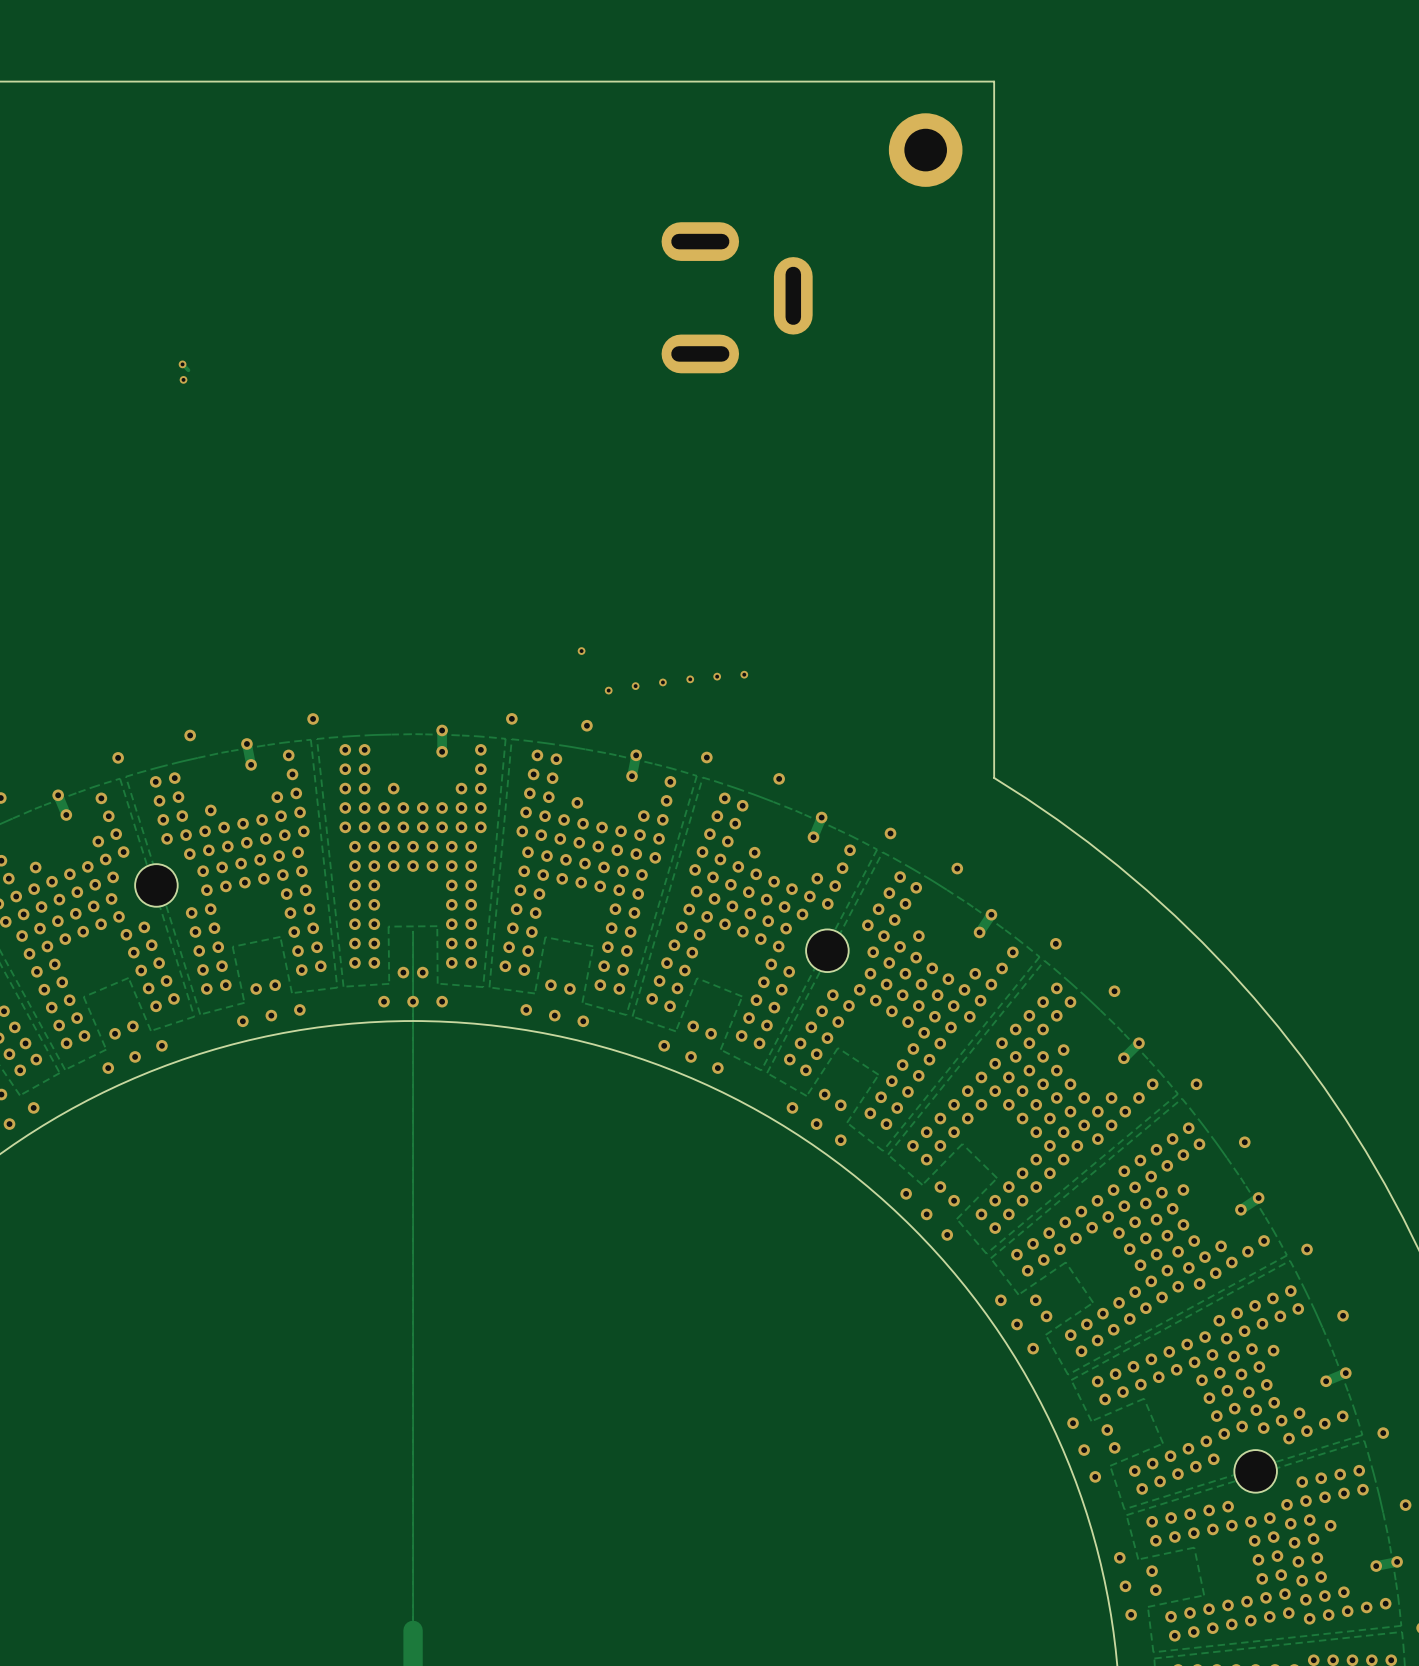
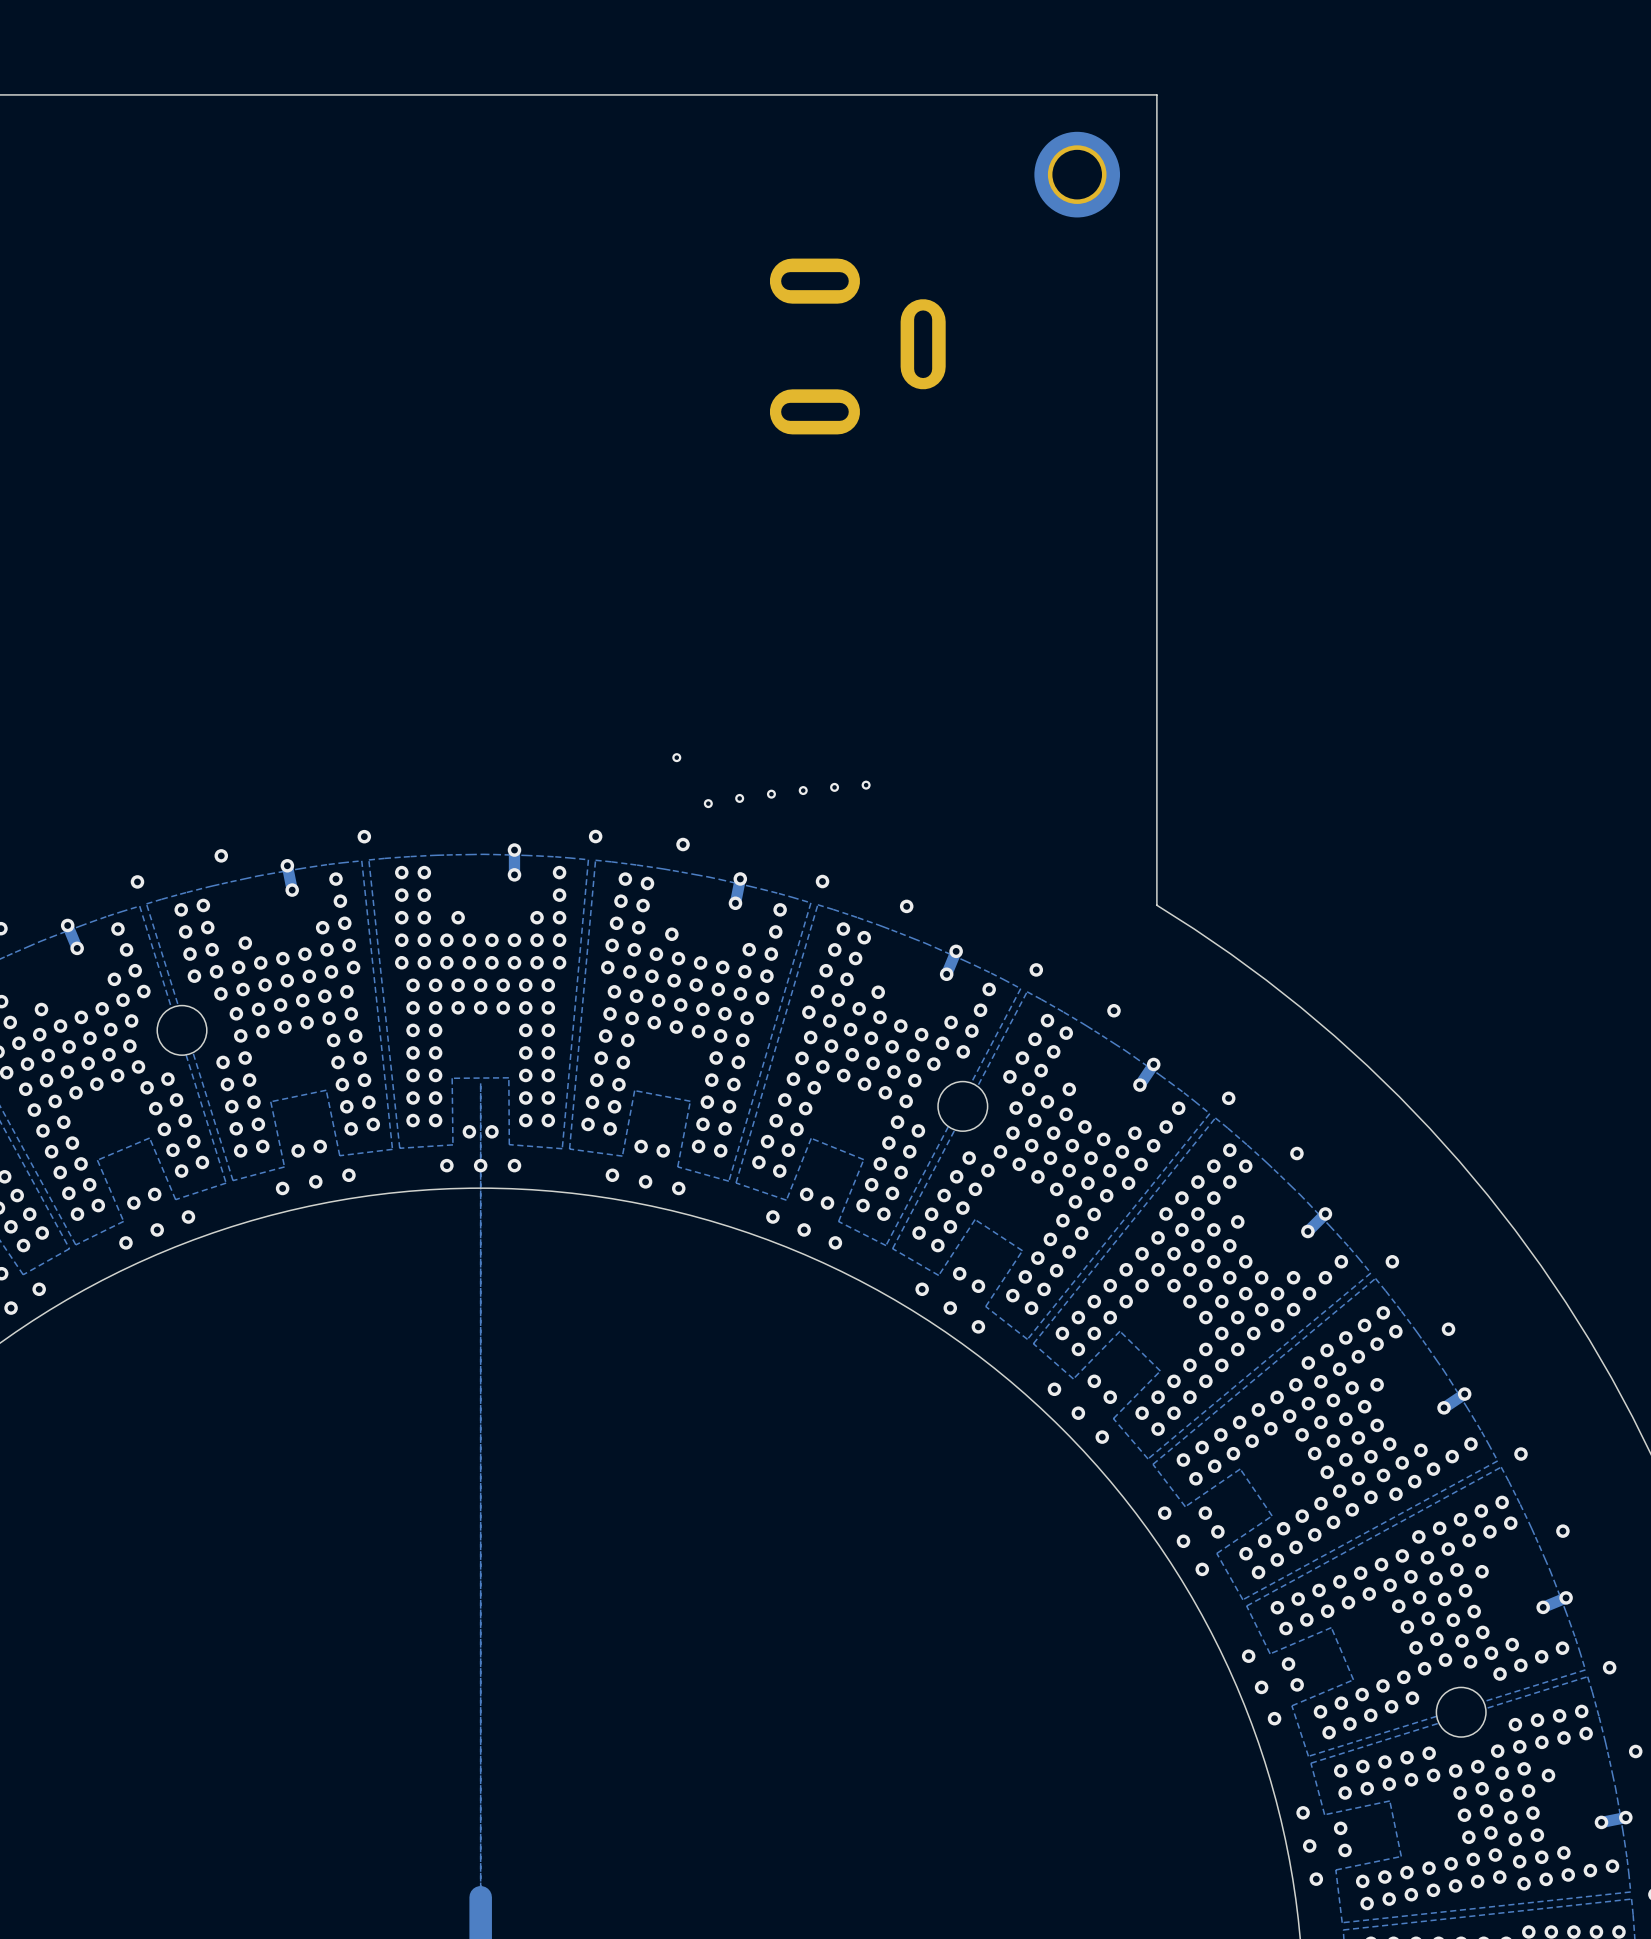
track: (182, 364) (188, 370) -> none
via: (182, 364) -> none
via: (183, 379) -> none

